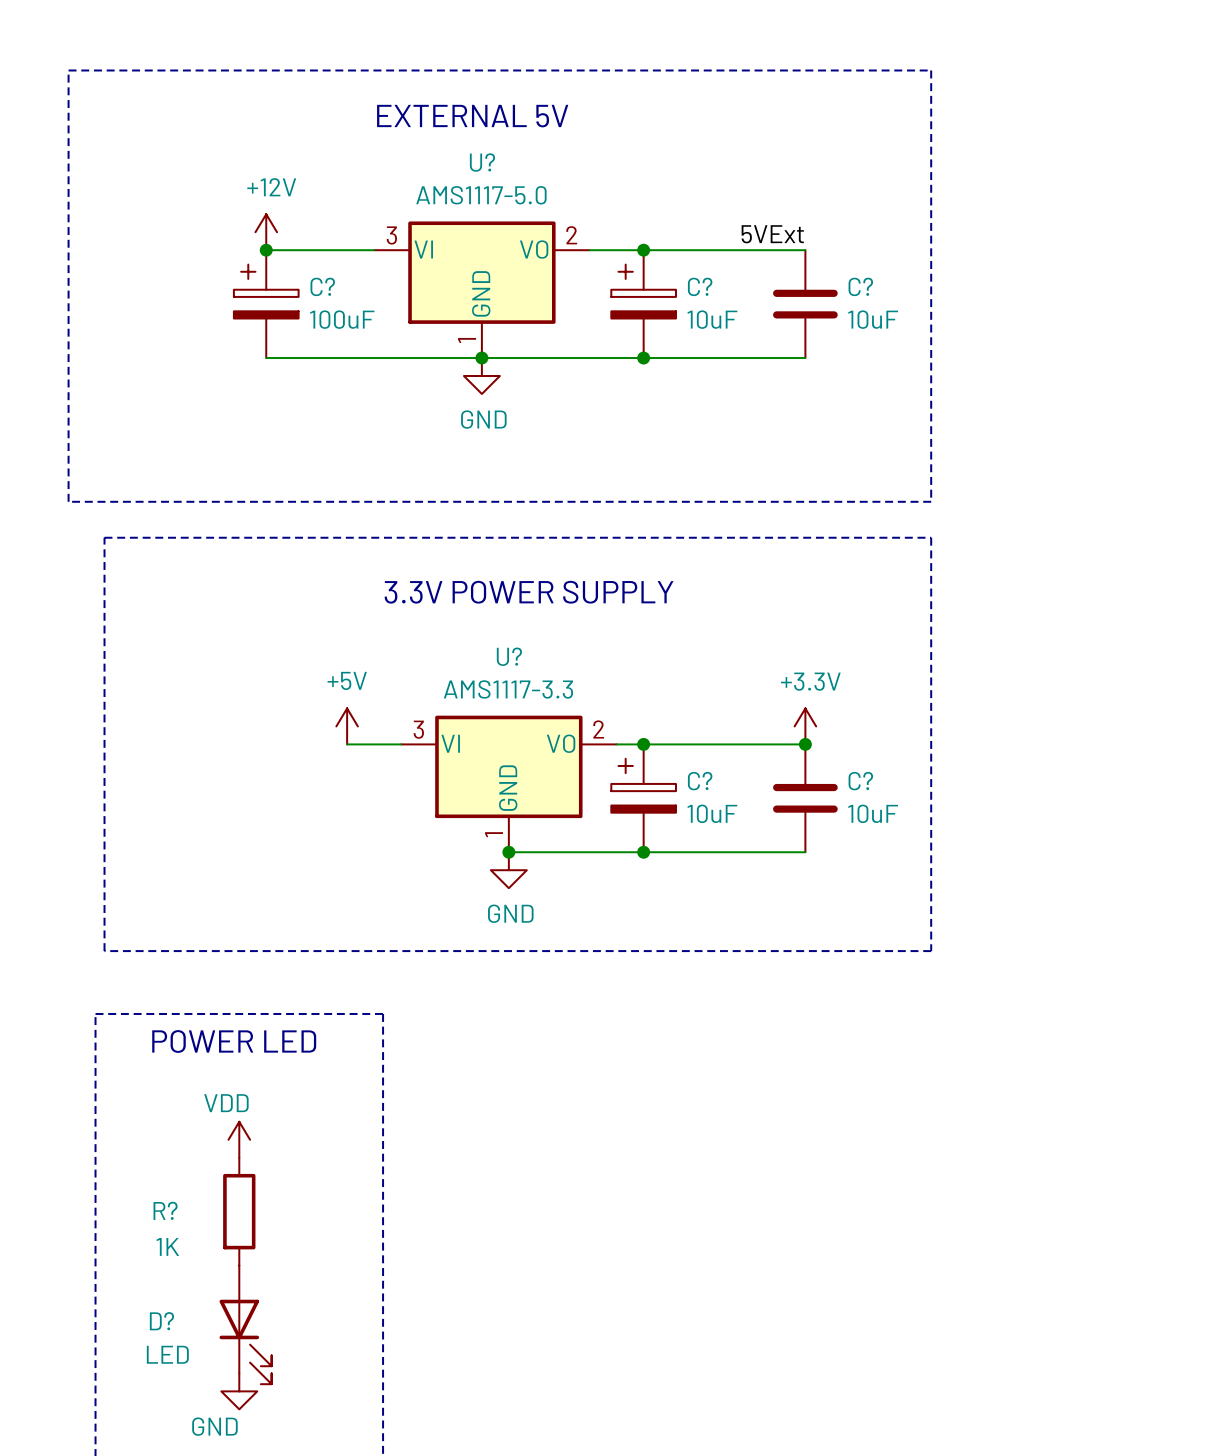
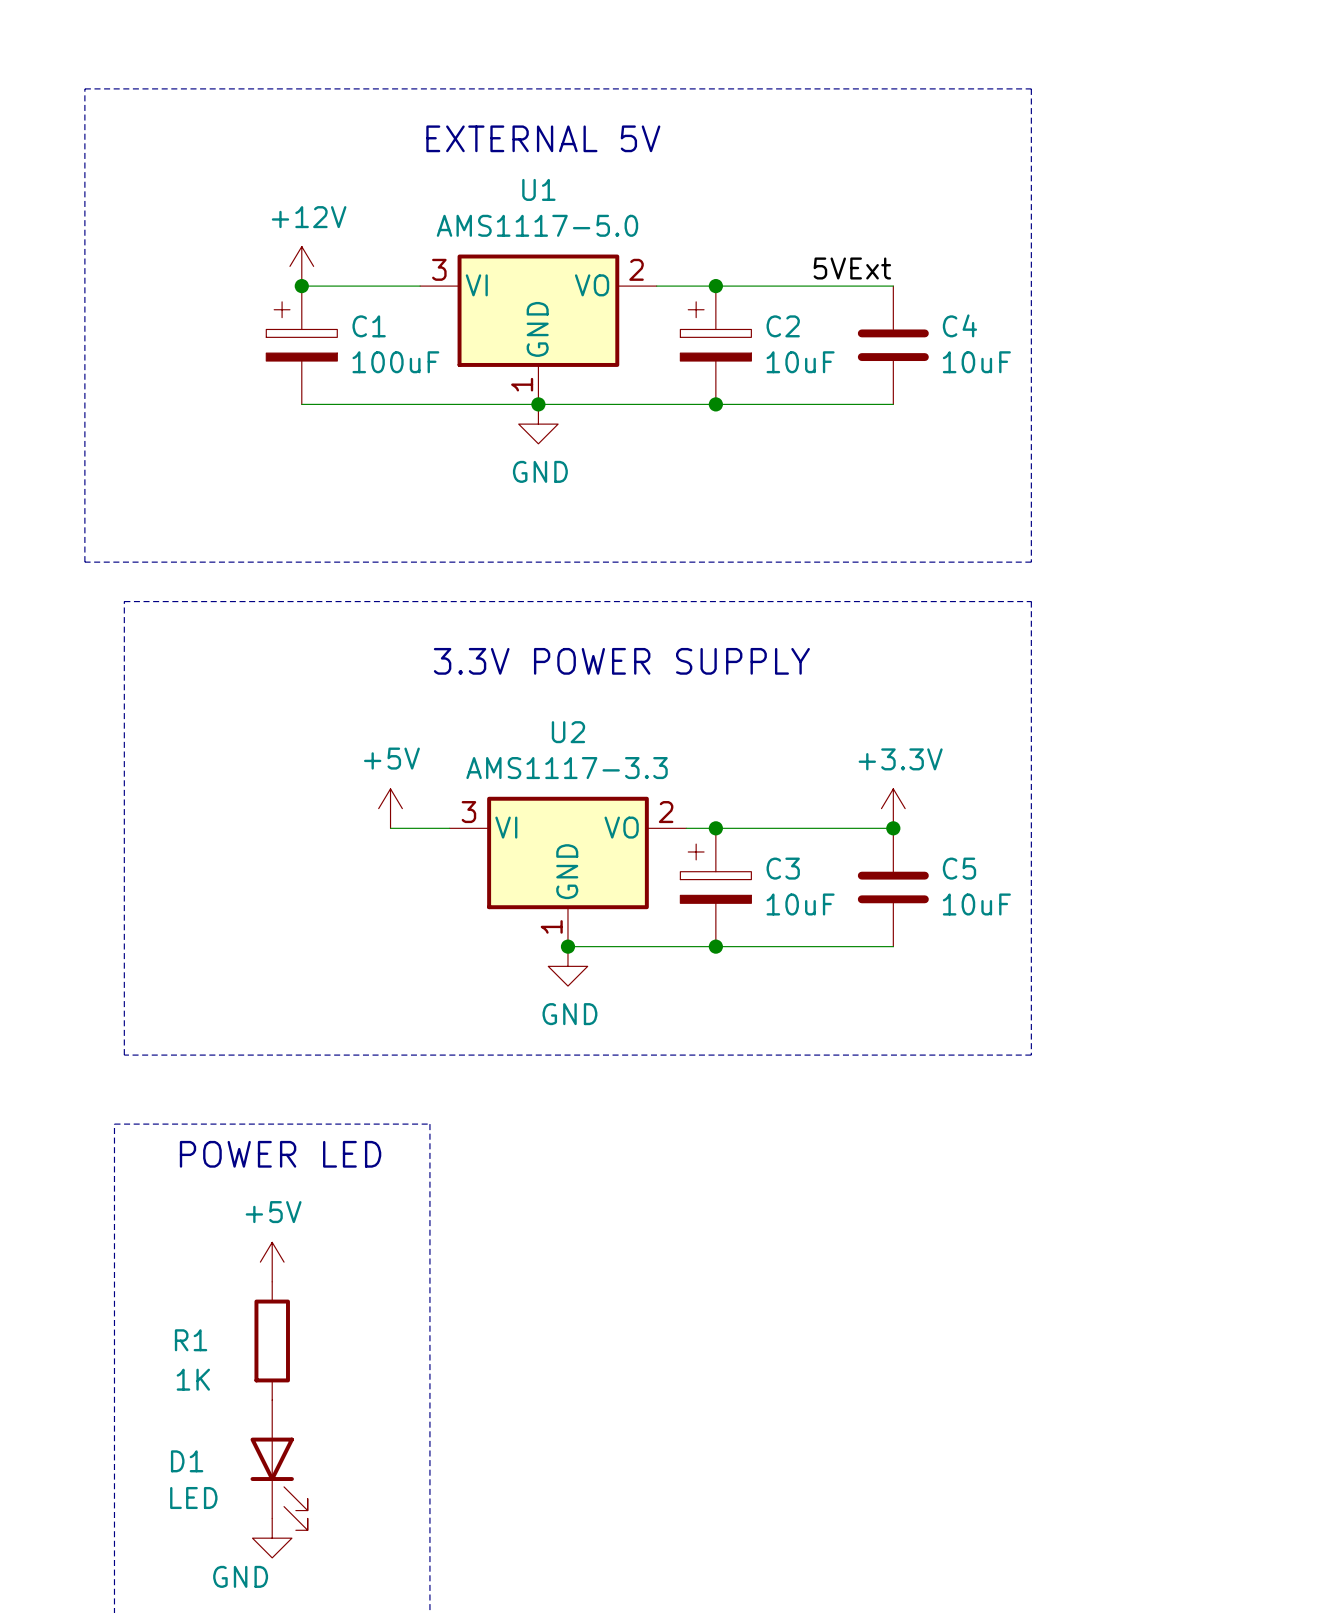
U? name: U? (482, 162) -> U1 (538, 189)
C? name: C? (322, 286) -> C1 (369, 326)
C? name: C? (700, 286) -> C2 (783, 326)
C? name: C? (860, 286) -> C4 (959, 325)
U? name: U? (509, 656) -> U2 (568, 732)
C? name: C? (700, 781) -> C3 (783, 868)
C? name: C? (860, 781) -> C5 (959, 868)
power symbol: VDD (239, 1139) -> +5V (272, 1262)
R? name: R? (165, 1210) -> R1 (191, 1340)
D? name: D? (161, 1321) -> D1 (187, 1461)

